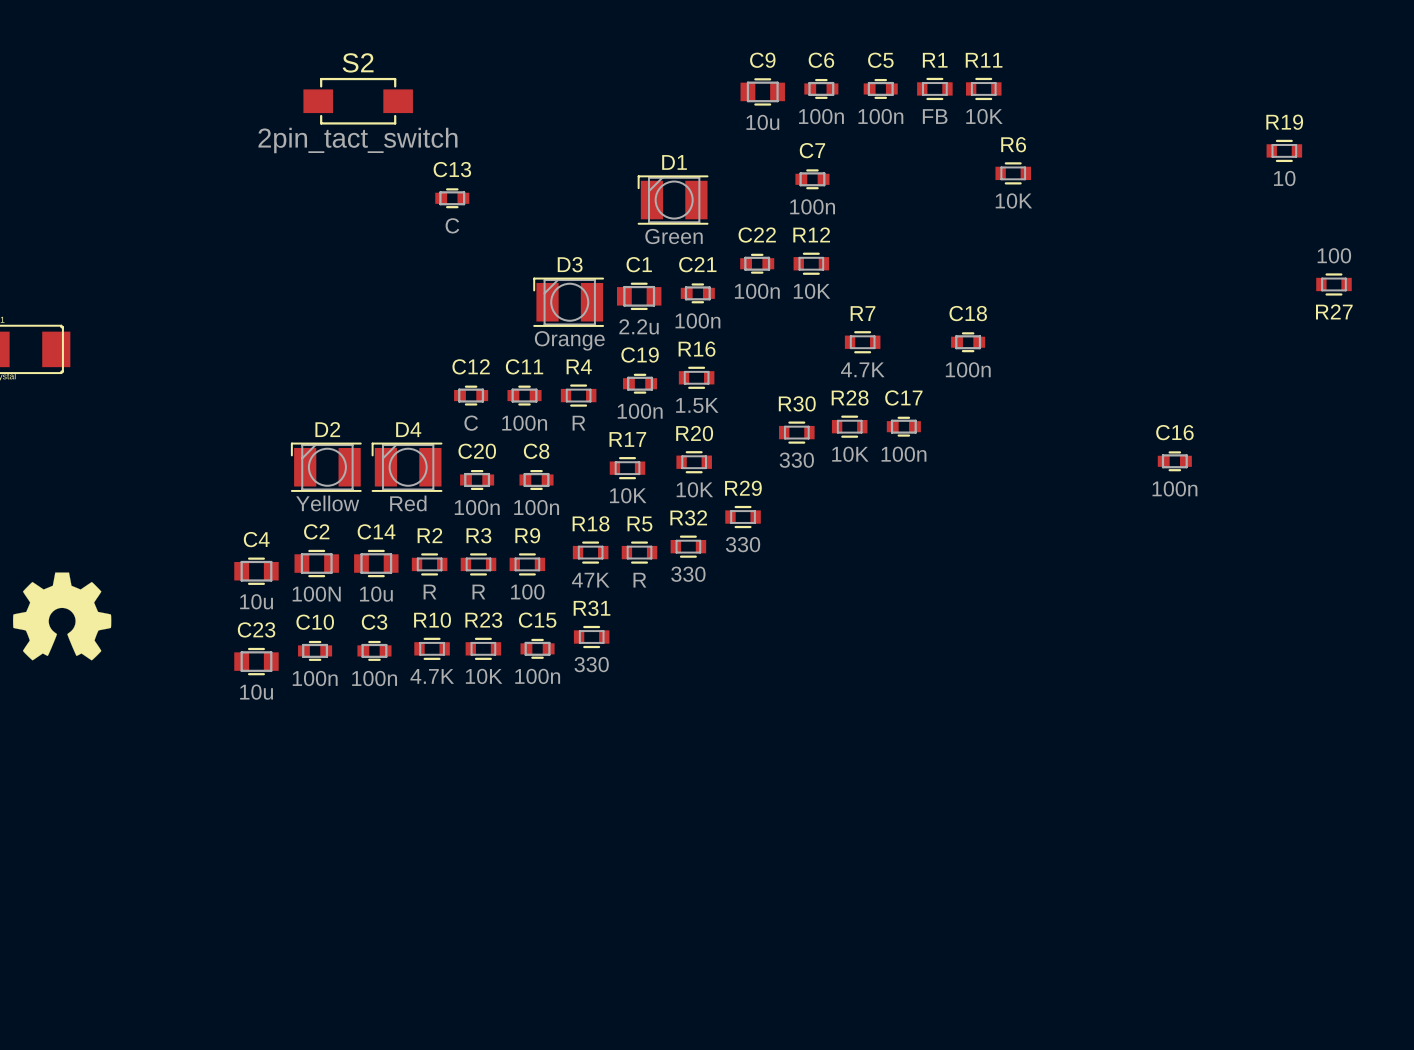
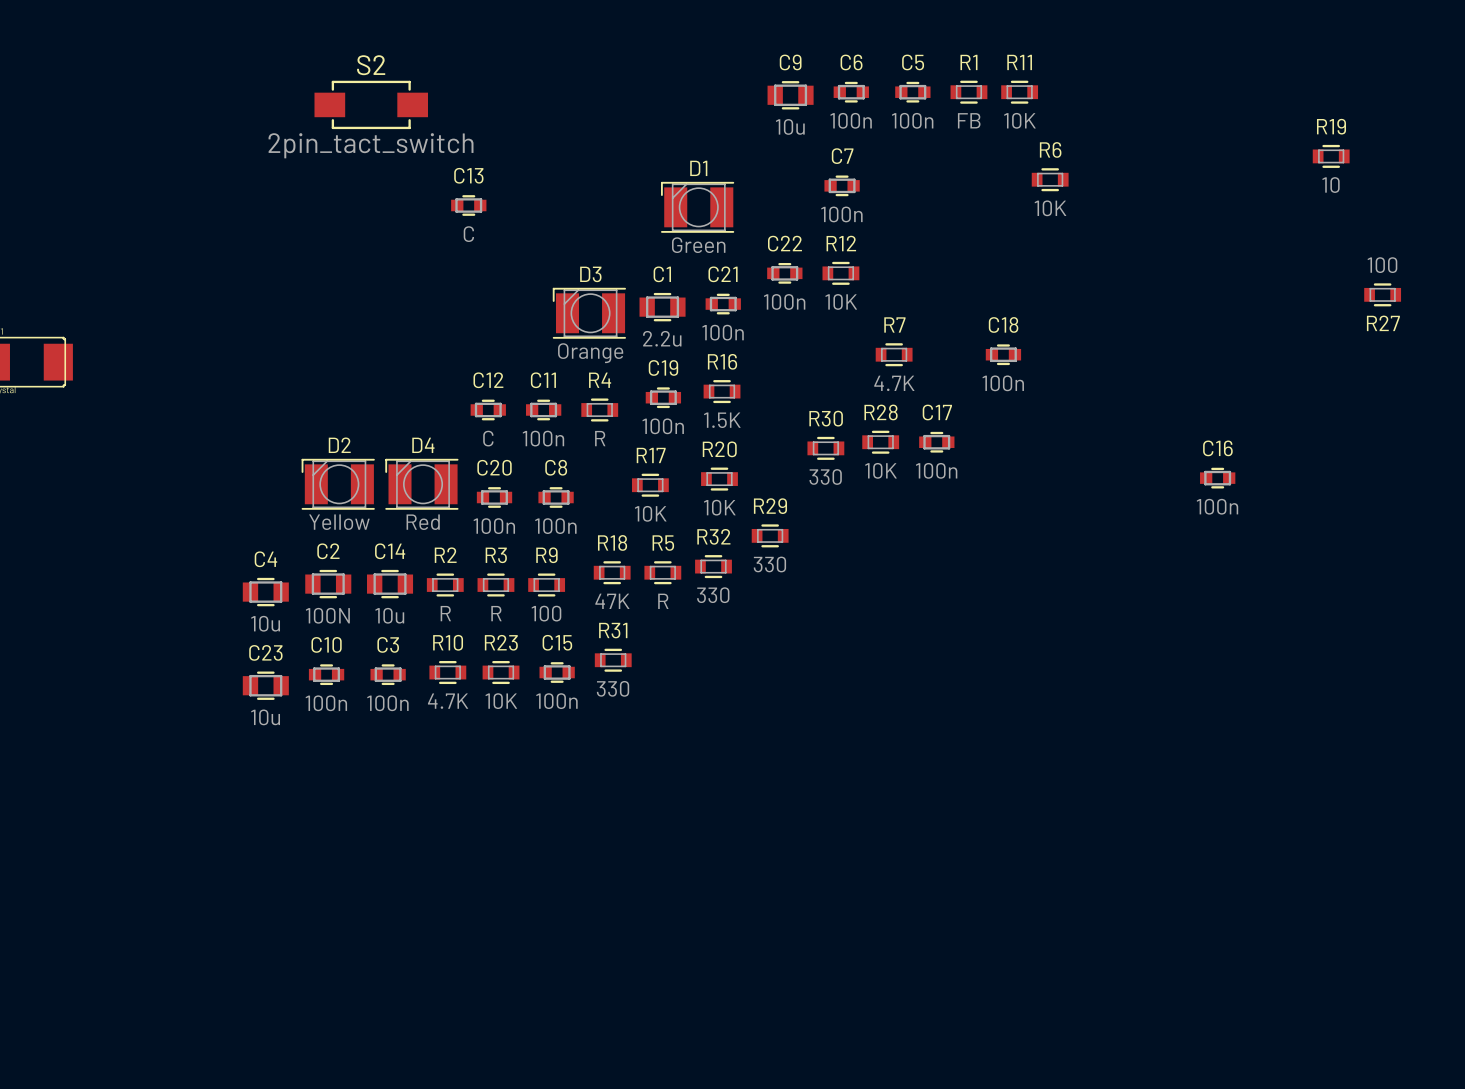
drawing: [13, 572, 112, 661] -> none

